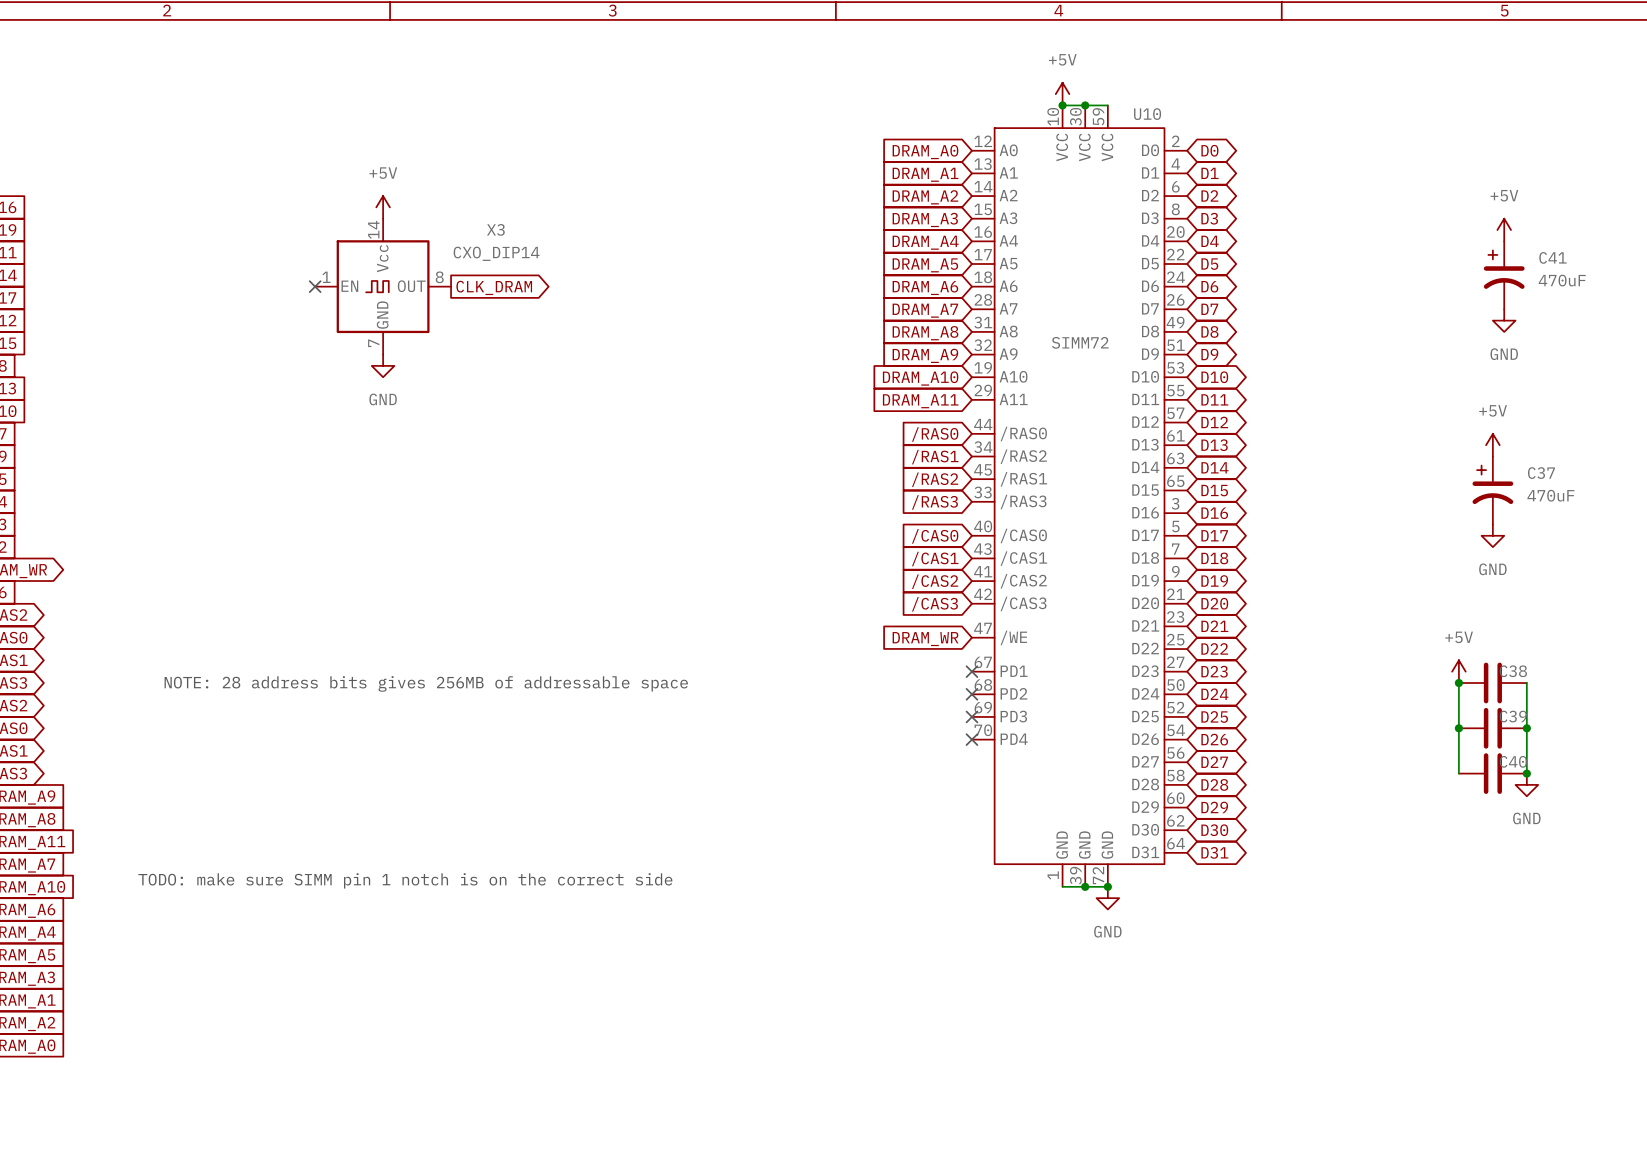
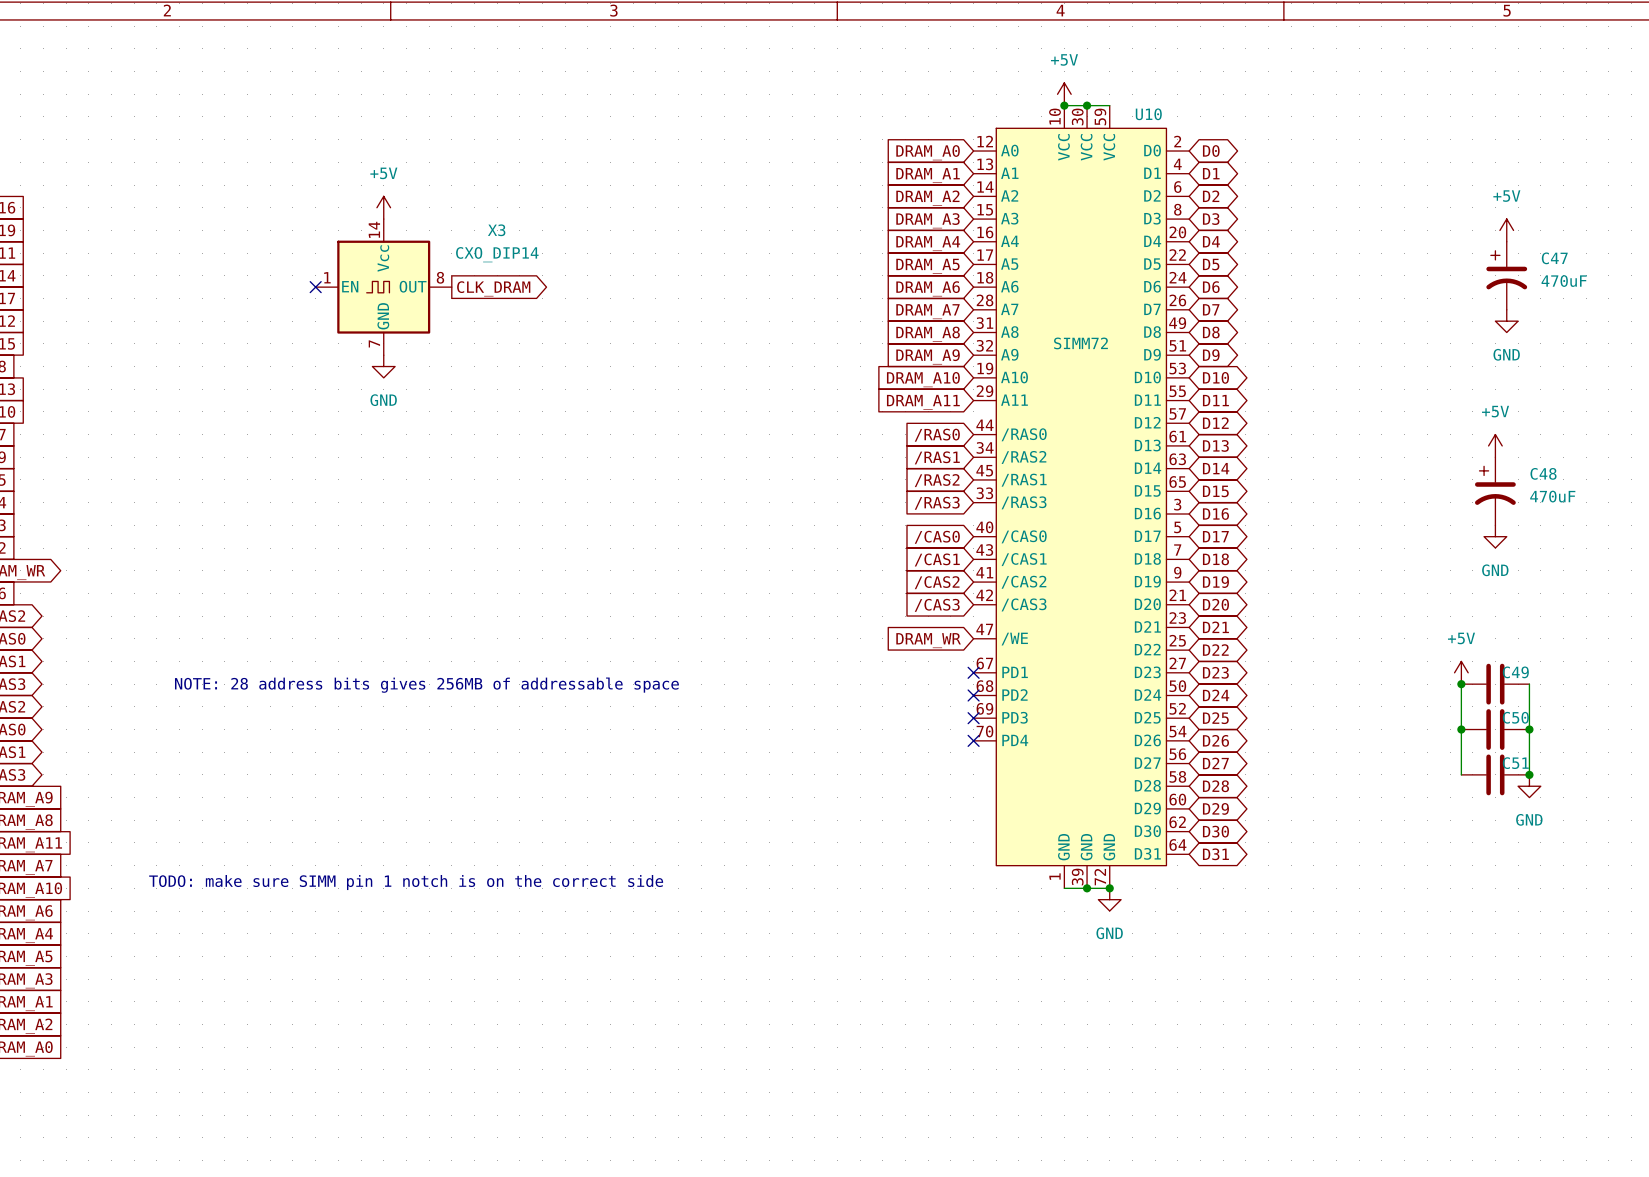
C41 name: C41 (1552, 257) -> C47 (1554, 258)
C37 name: C37 (1541, 473) -> C48 (1543, 473)
C38 name: C38 (1513, 671) -> C49 (1515, 672)
C39 name: C39 (1513, 716) -> C50 (1515, 717)
C40 name: C40 (1513, 761) -> C51 (1515, 763)

